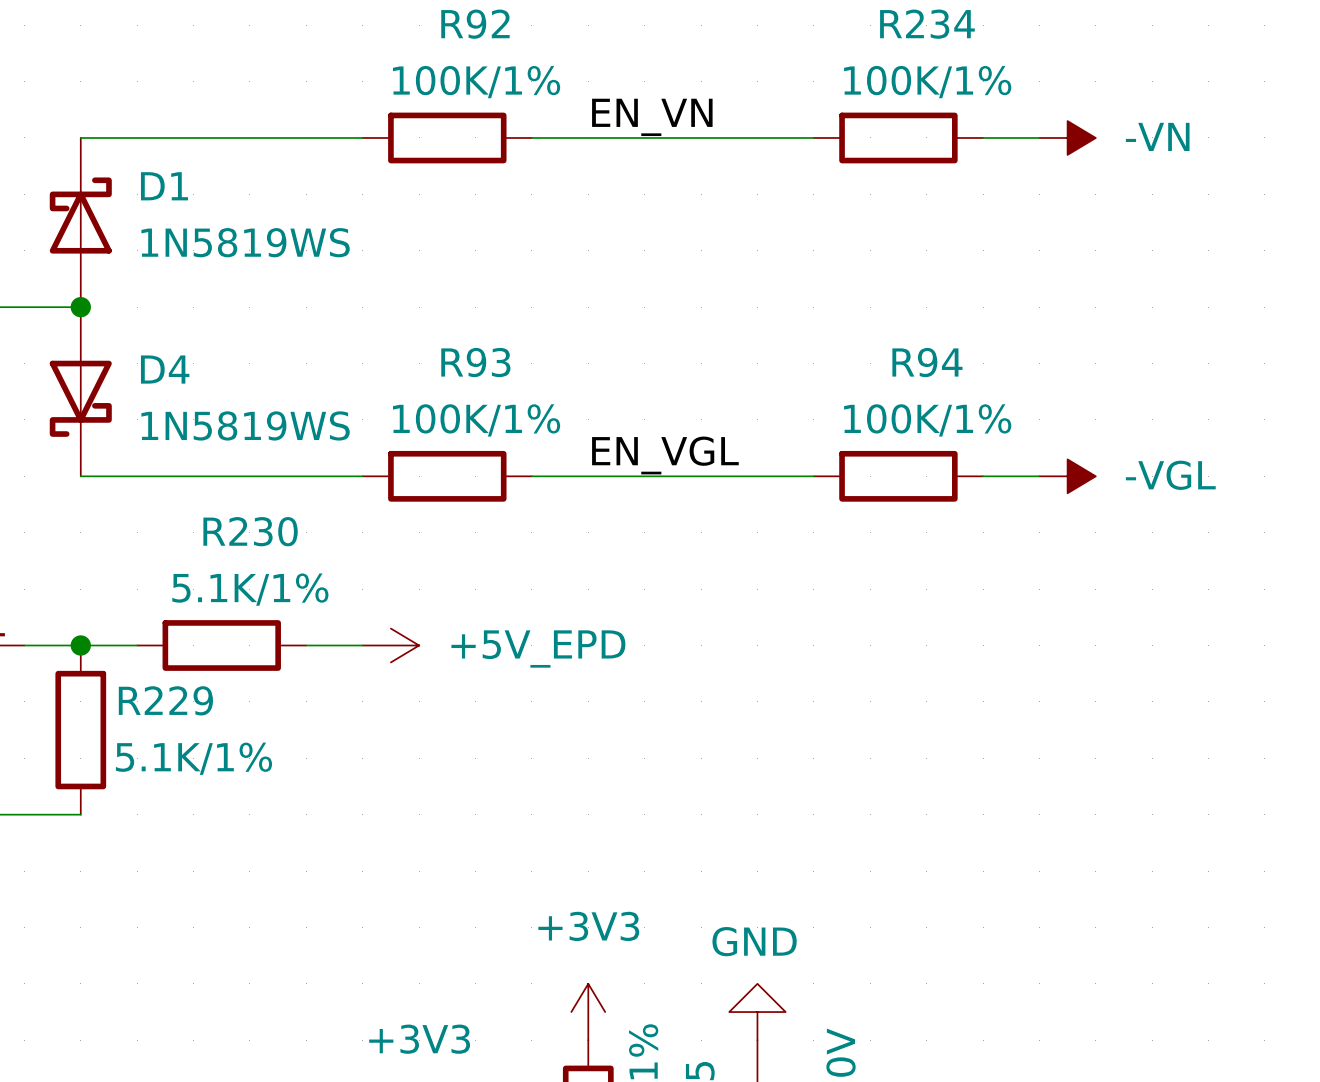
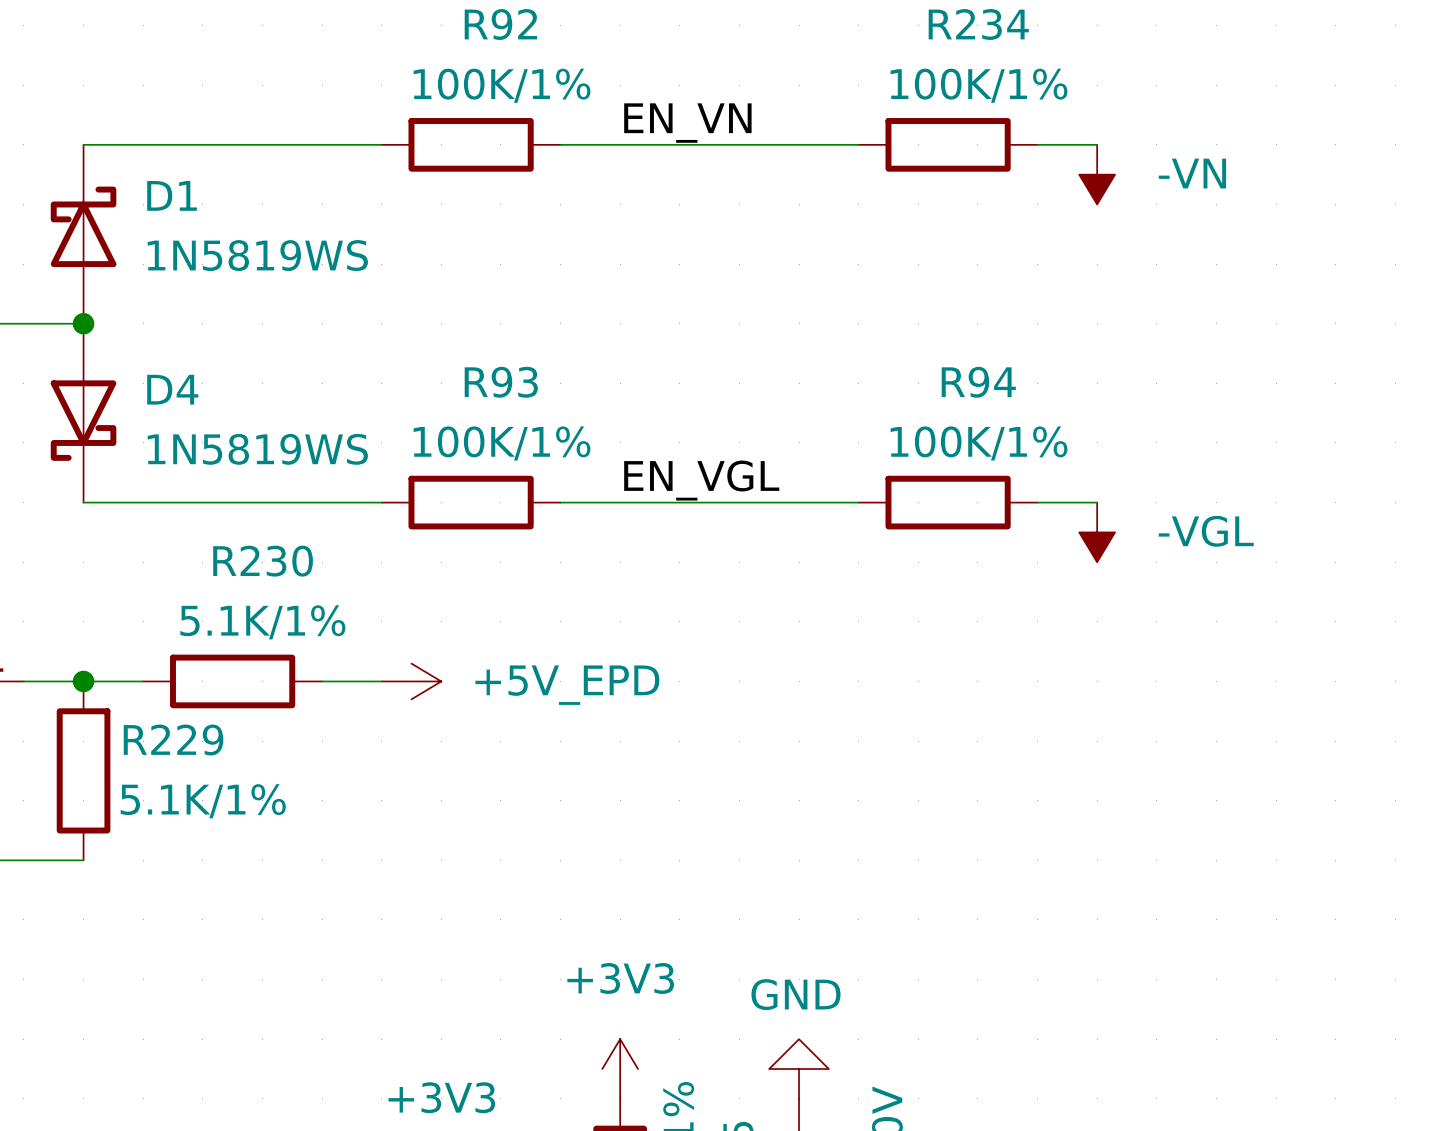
power symbol rotation: 0° (1067, 137) -> 90° clockwise (1097, 174)
power symbol position: -VN (1067, 137) -> -VN (1097, 174)
power symbol rotation: 0° (1067, 476) -> 90° clockwise (1097, 532)
power symbol position: -VGL (1067, 476) -> -VGL (1097, 532)

